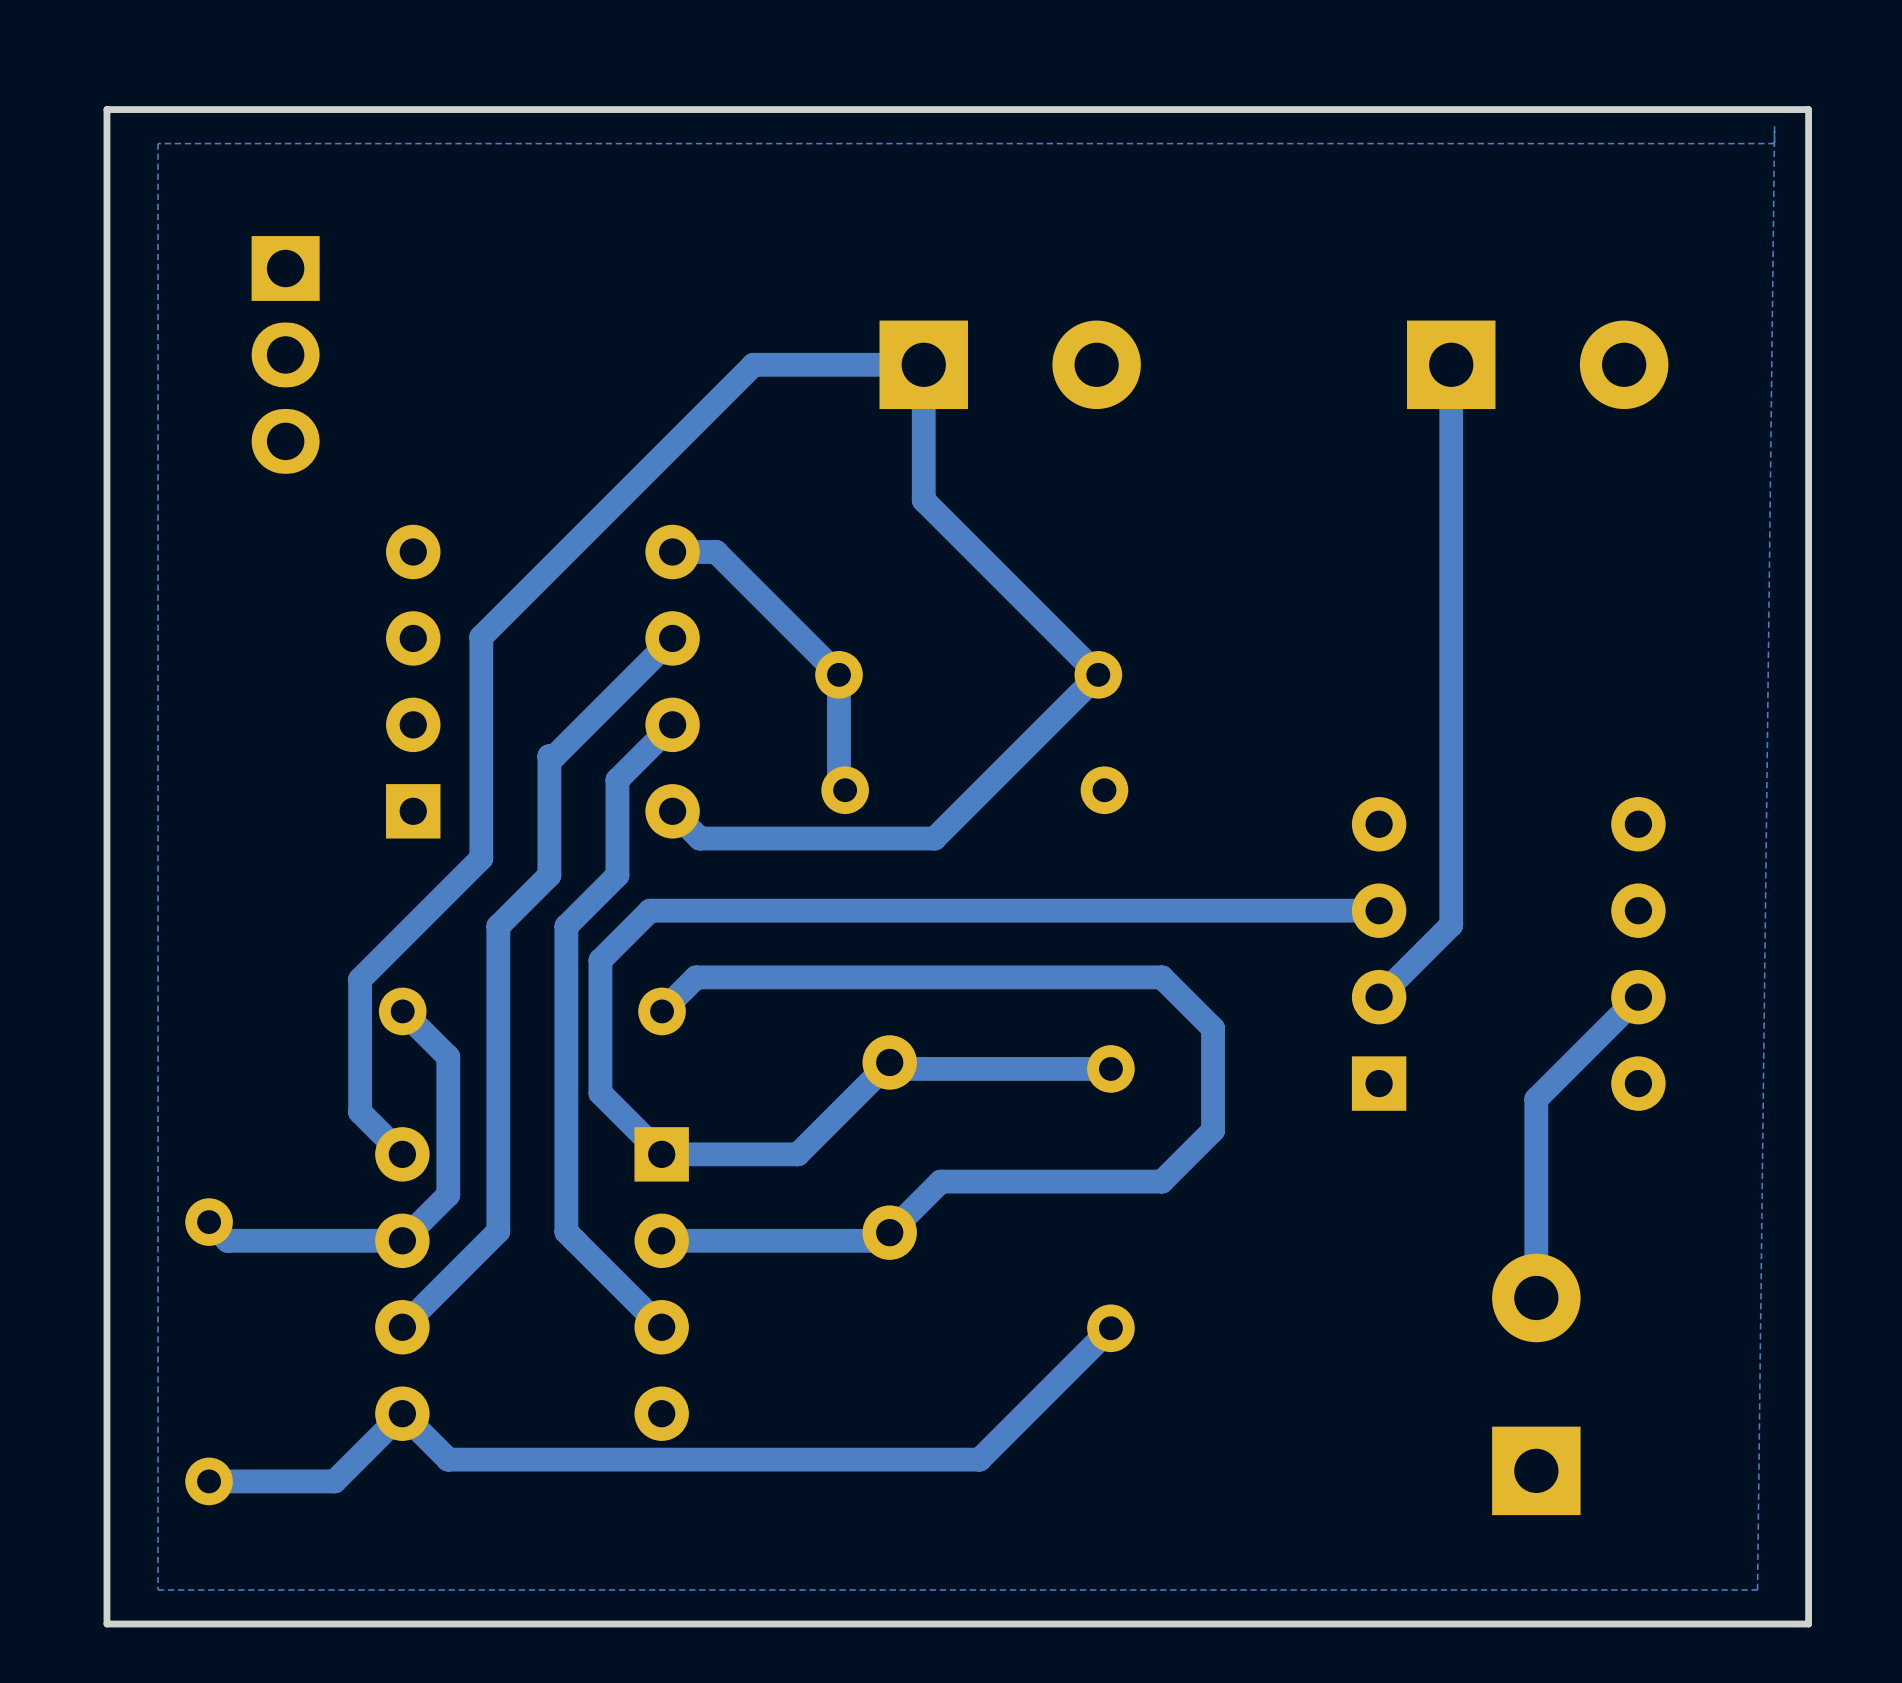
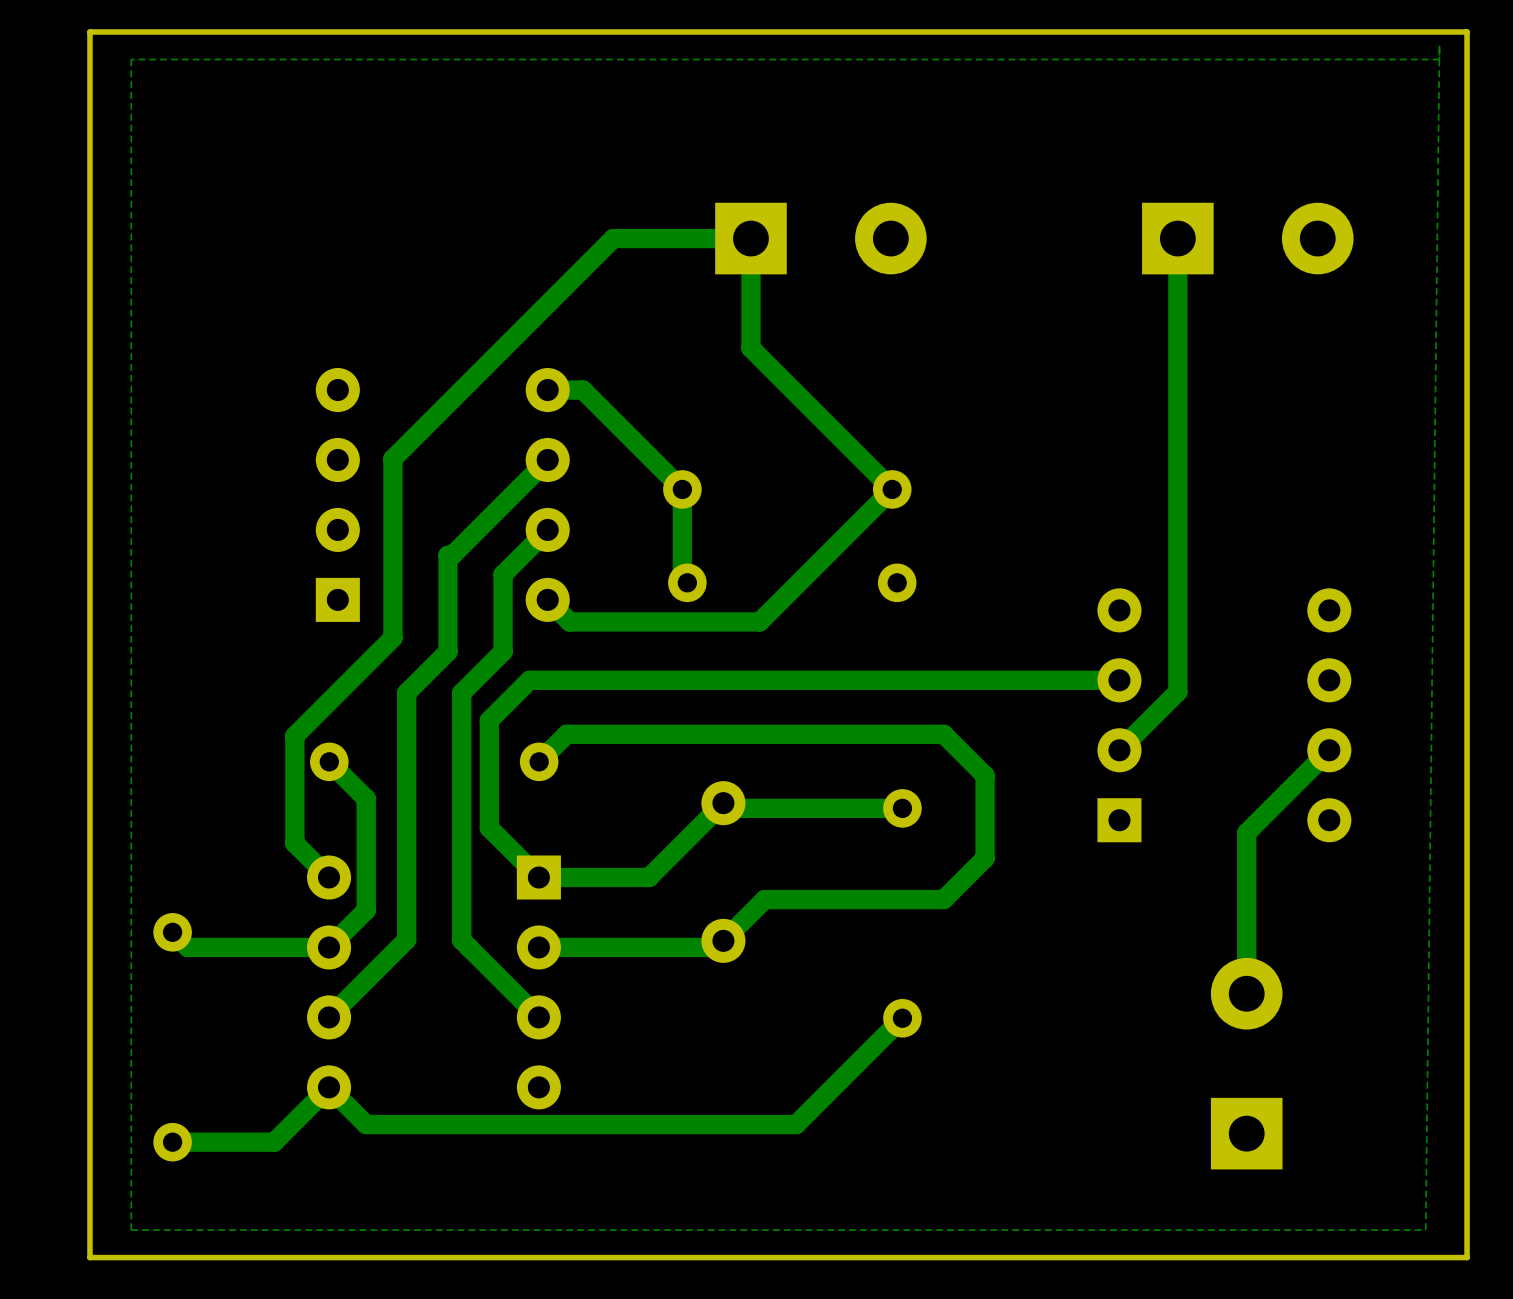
part: (285, 354) -> none

